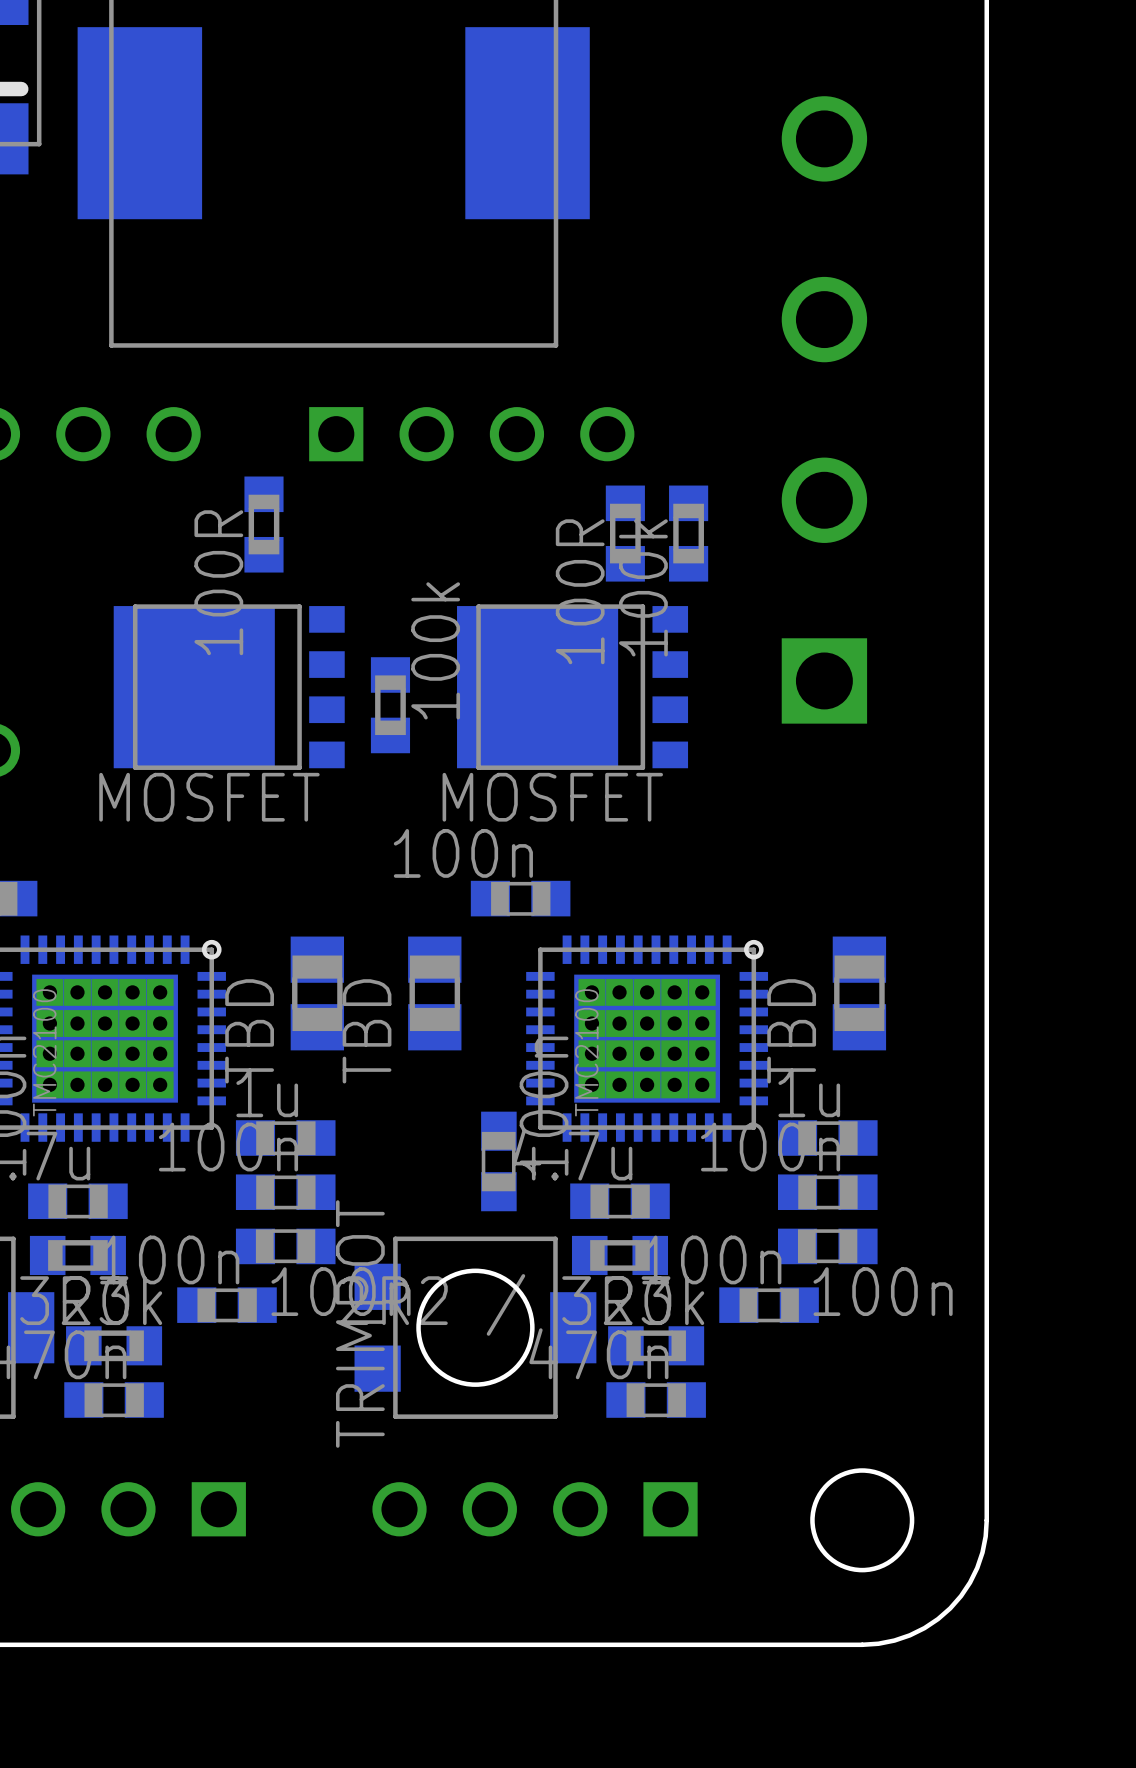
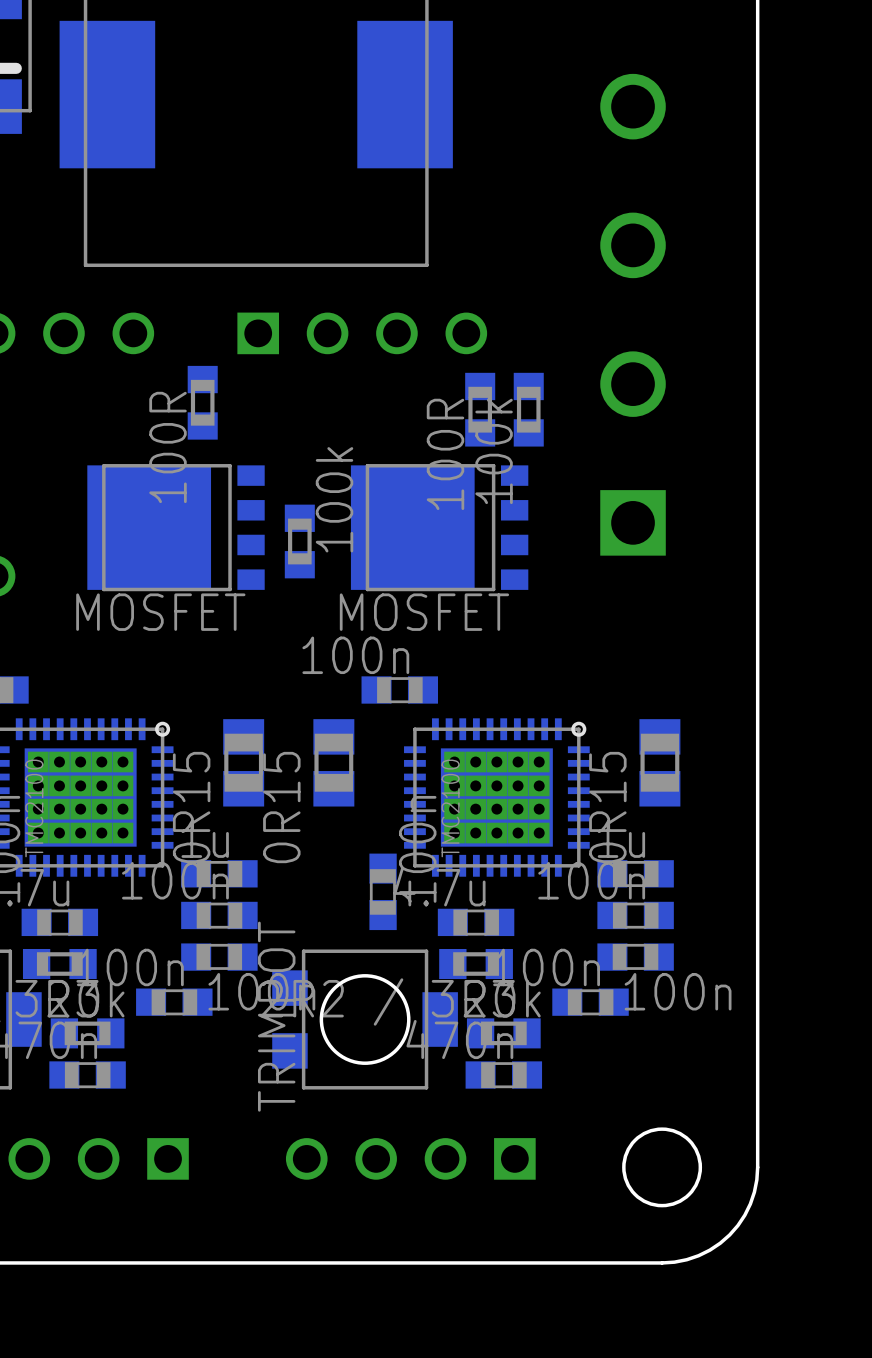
part value: TBD (249, 1031) -> 0R15 (191, 807)
part value: TBD (367, 1031) -> 0R15 (281, 807)
part value: TBD (791, 1031) -> 0R15 (607, 807)

